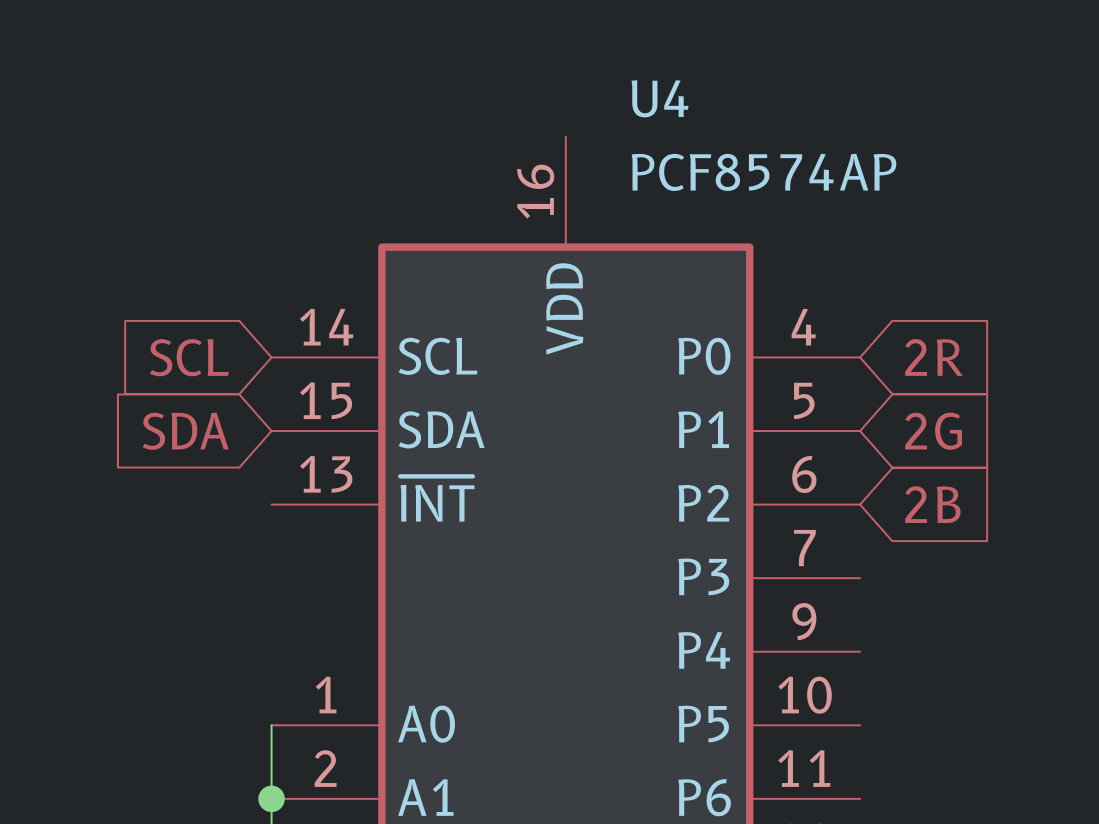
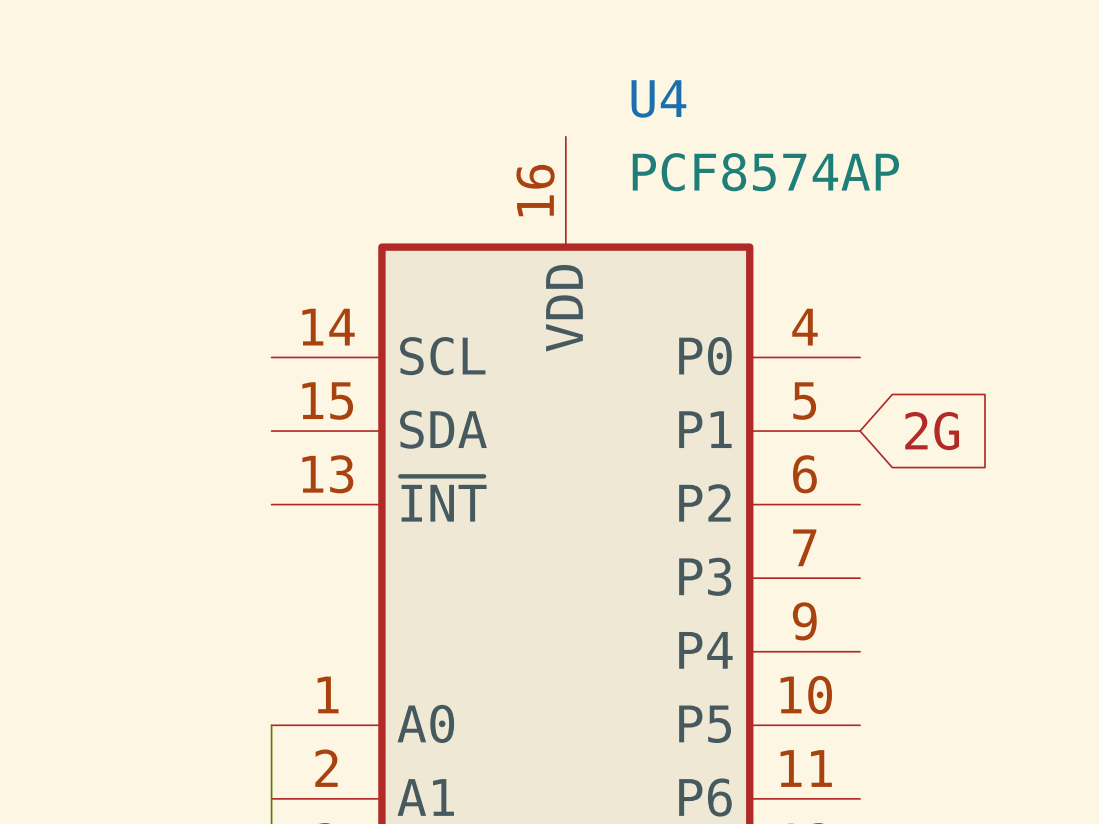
global label: SCL (189, 357) -> none
global label: 2R (933, 357) -> none
global label: SDA (185, 431) -> none
global label: 2B (932, 504) -> none
junction: (271, 798) -> none

